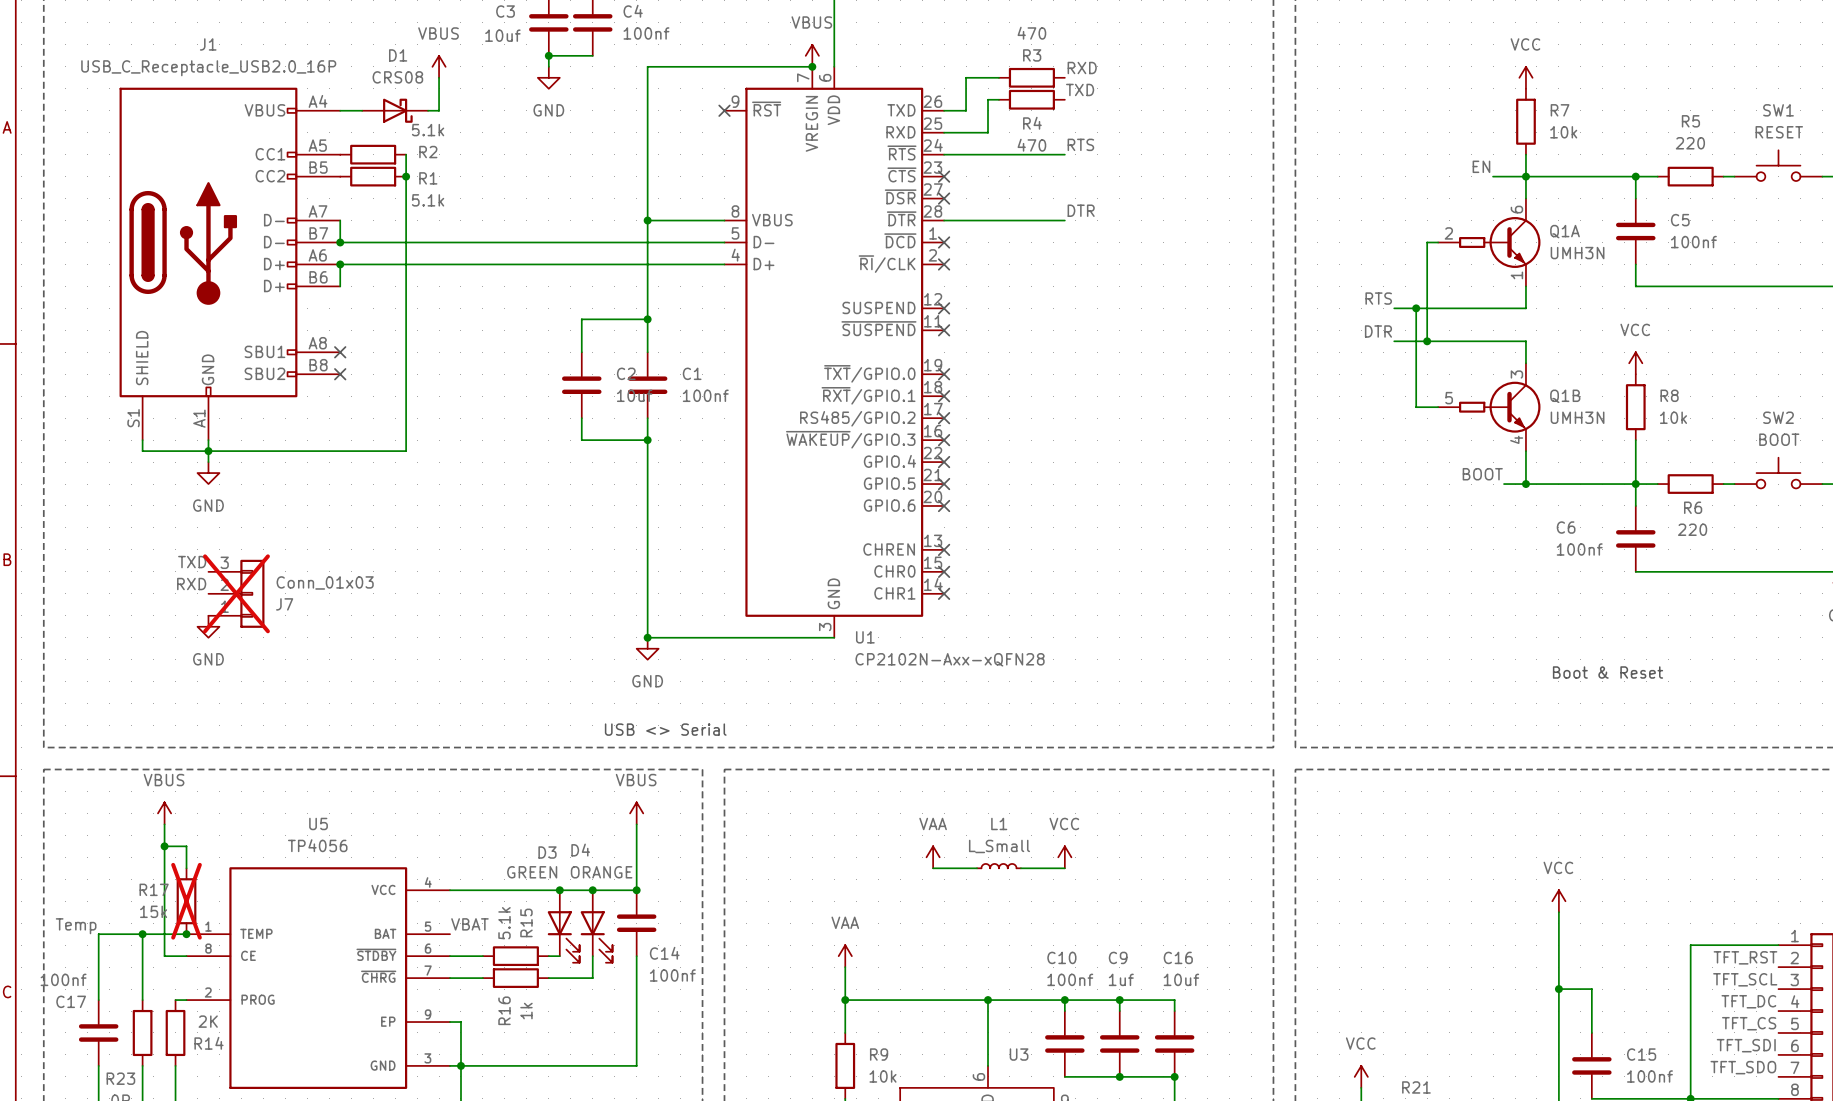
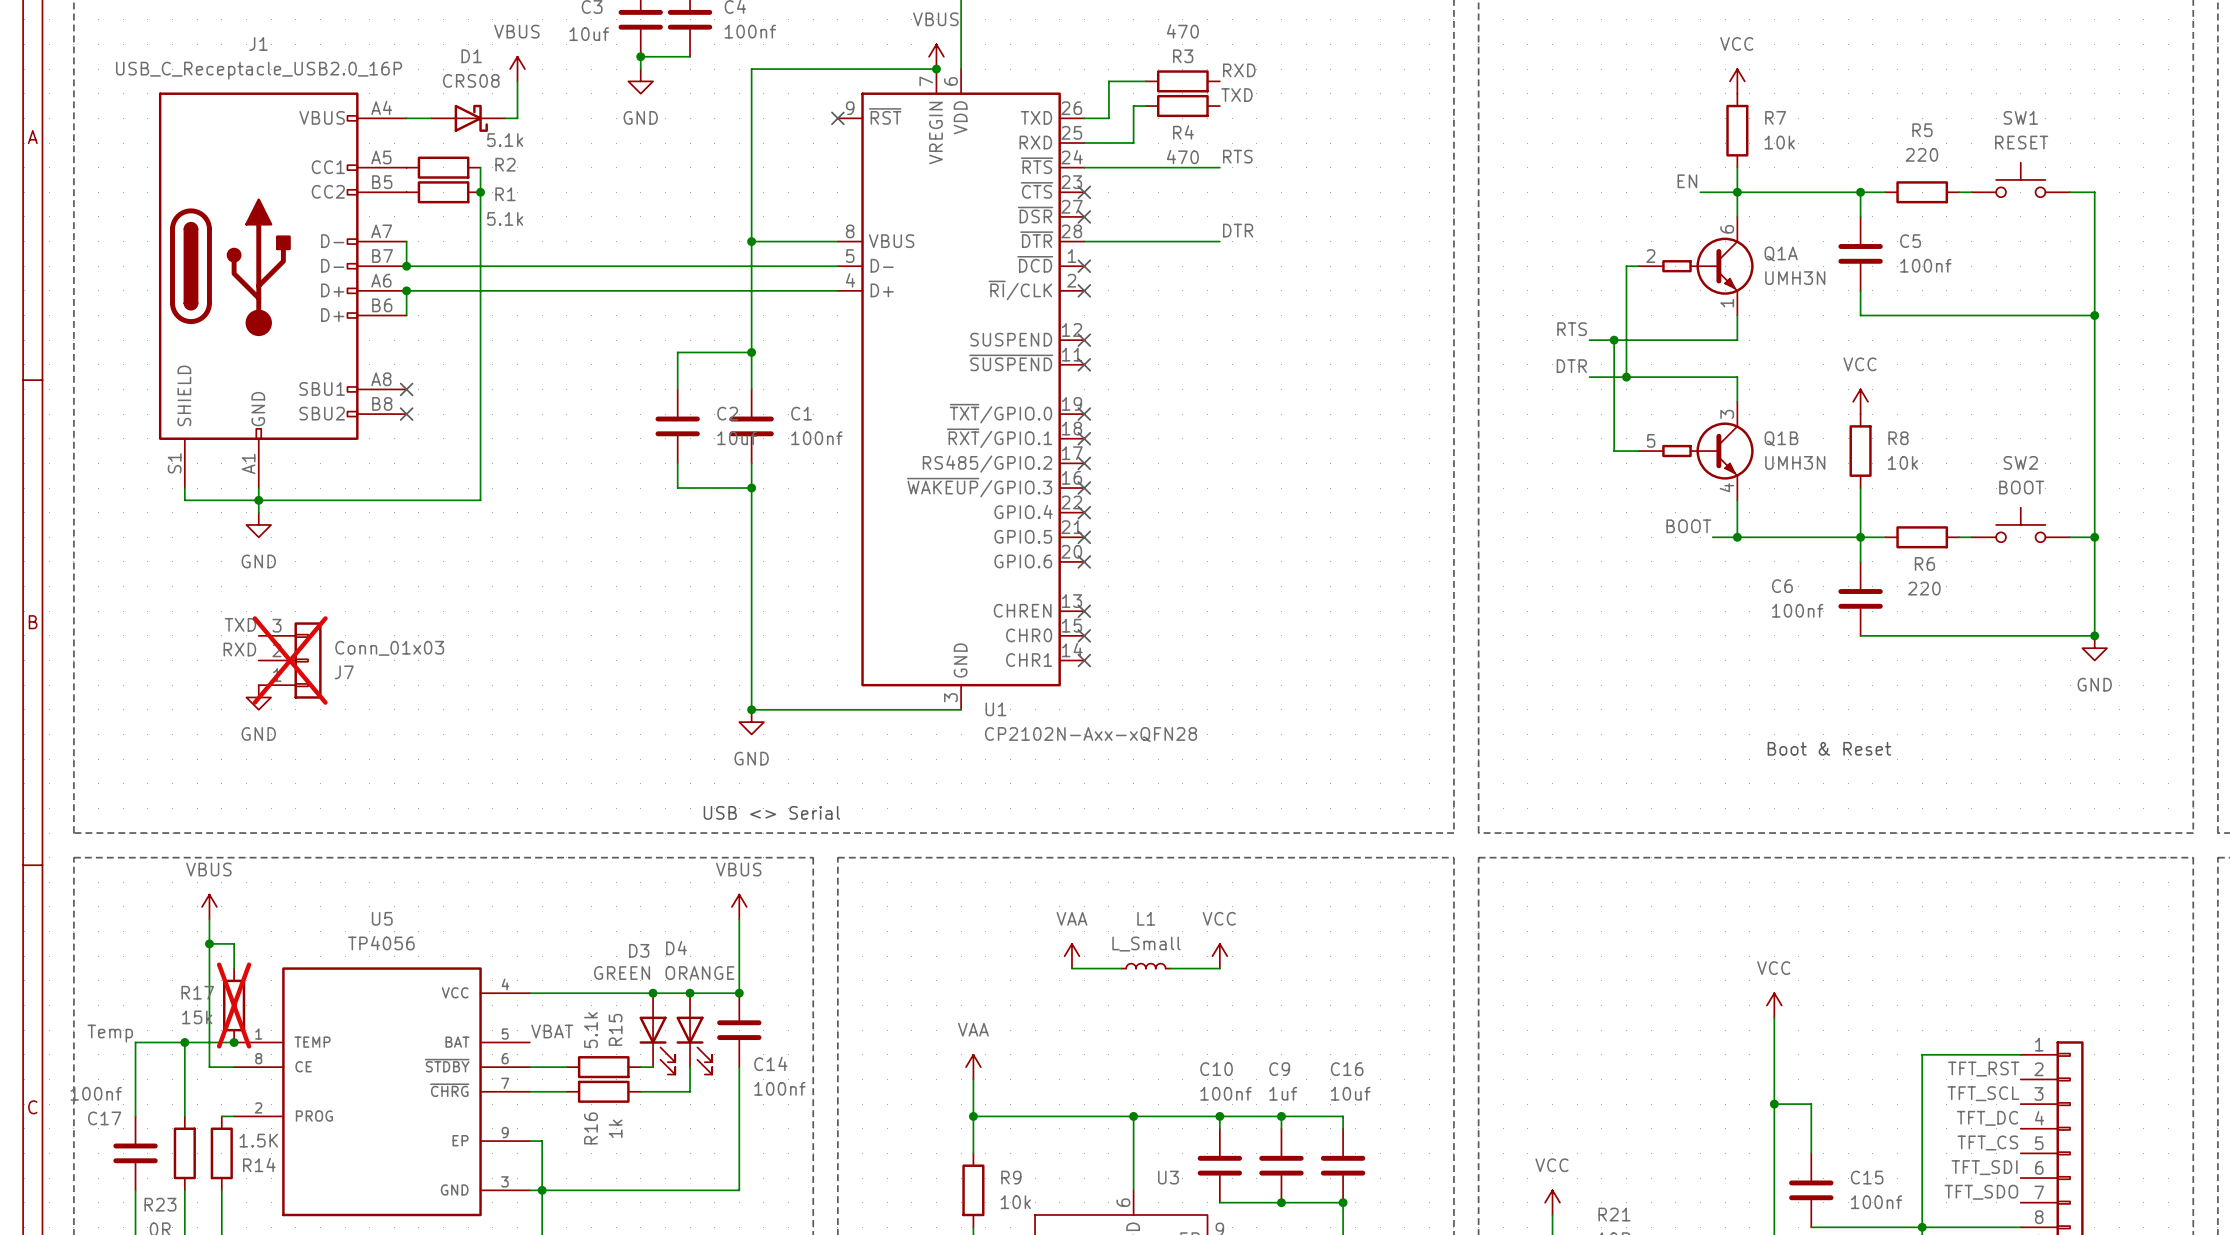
R14 value: 2K (208, 1021) -> 1.5K (258, 1140)

